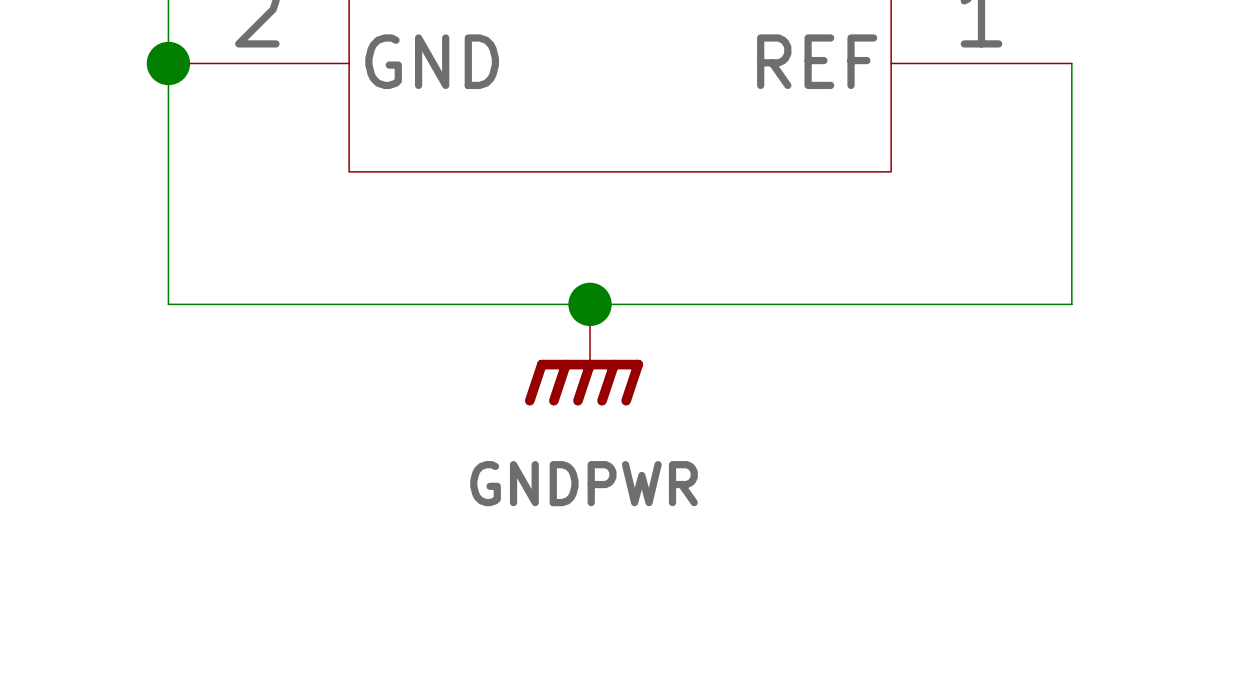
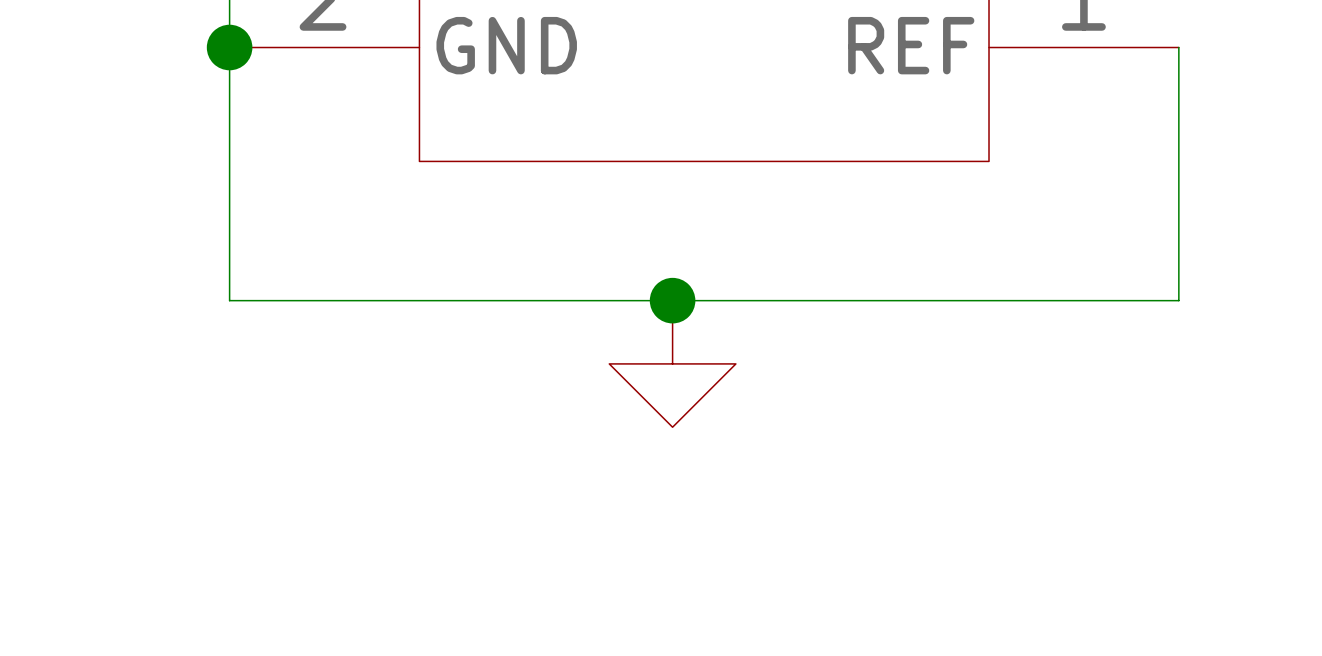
power symbol shape: [524, 304, 644, 406] -> [609, 300, 736, 428]
power symbol text: GNDPWR (584, 483) -> none

